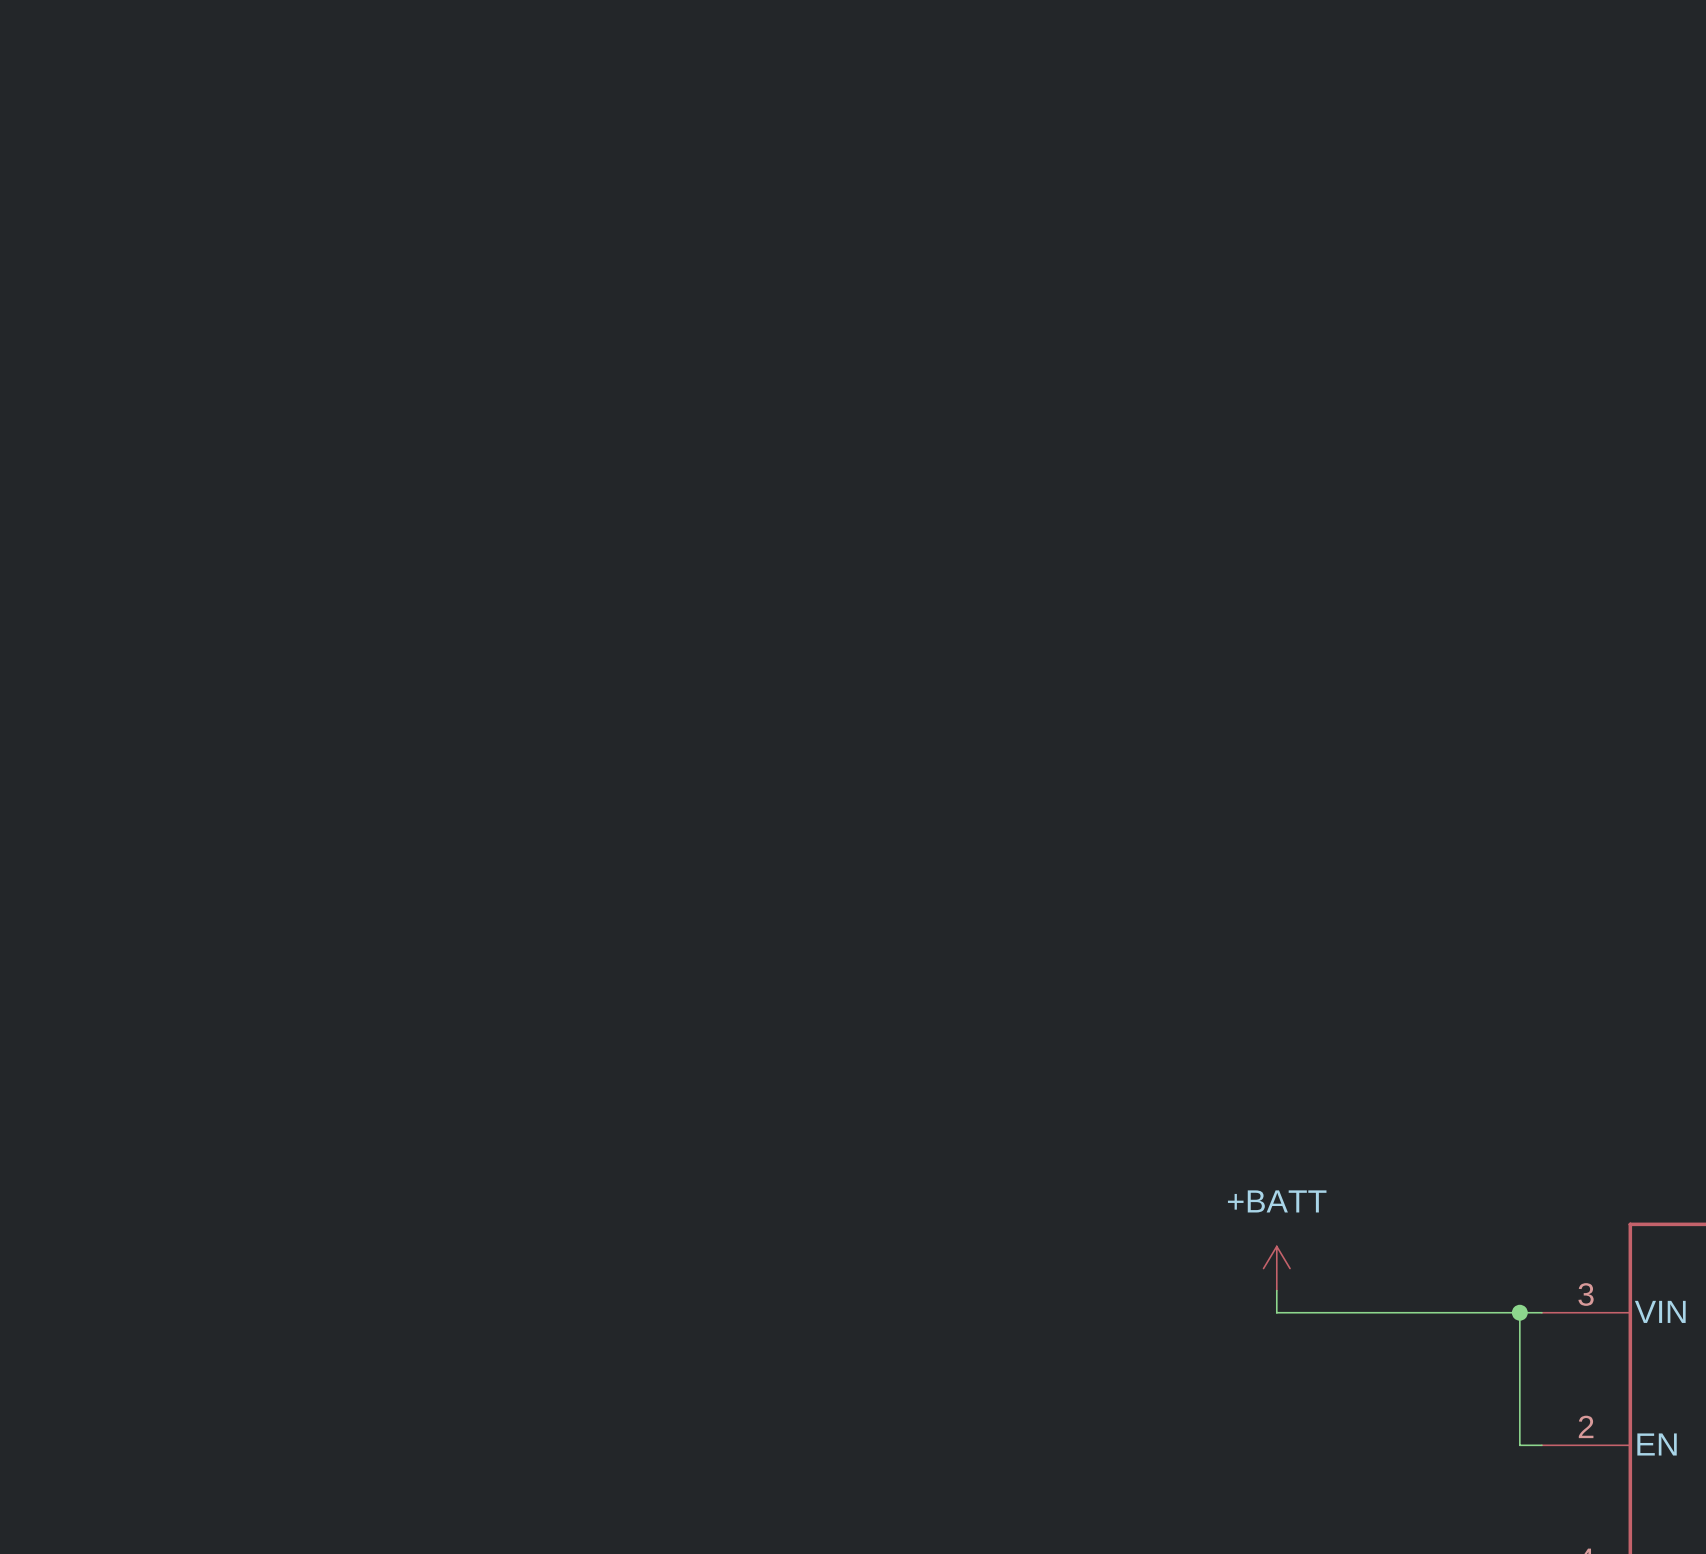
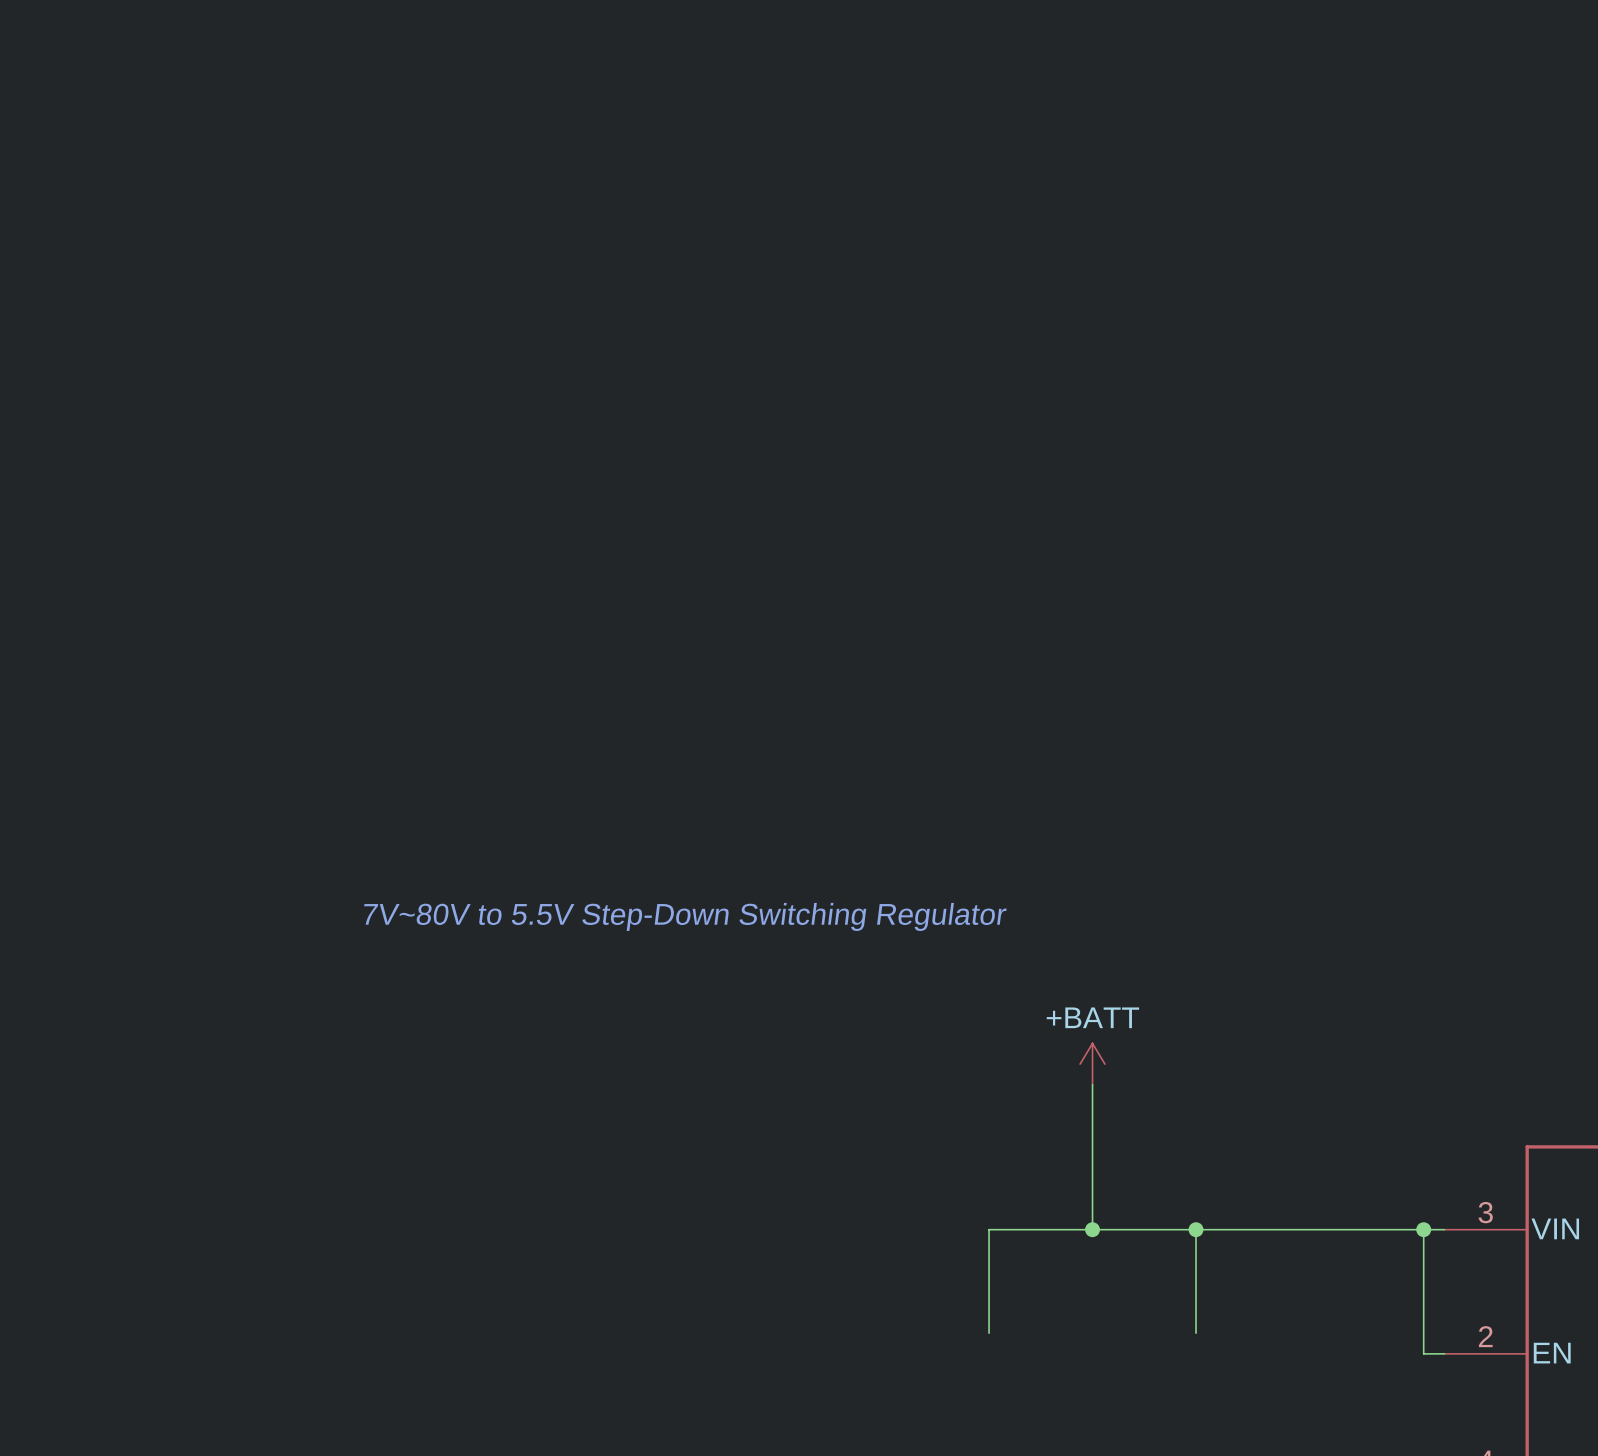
text: none -> 7V~80V to 5.5V Step-Down Switching Regulator (685, 916)
wire: none -> (1092, 1084) (1092, 1229)
power symbol text position: +BATT (1277, 1201) -> +BATT (1092, 1017)
power symbol position: +BATT (1276, 1268) -> +BATT (1092, 1064)
wire: (1276, 1290) (1276, 1312) -> none
junction: none -> (1092, 1229)
junction: none -> (1196, 1229)
wire: none -> (989, 1333) (989, 1229) (1196, 1229) (1196, 1333)

